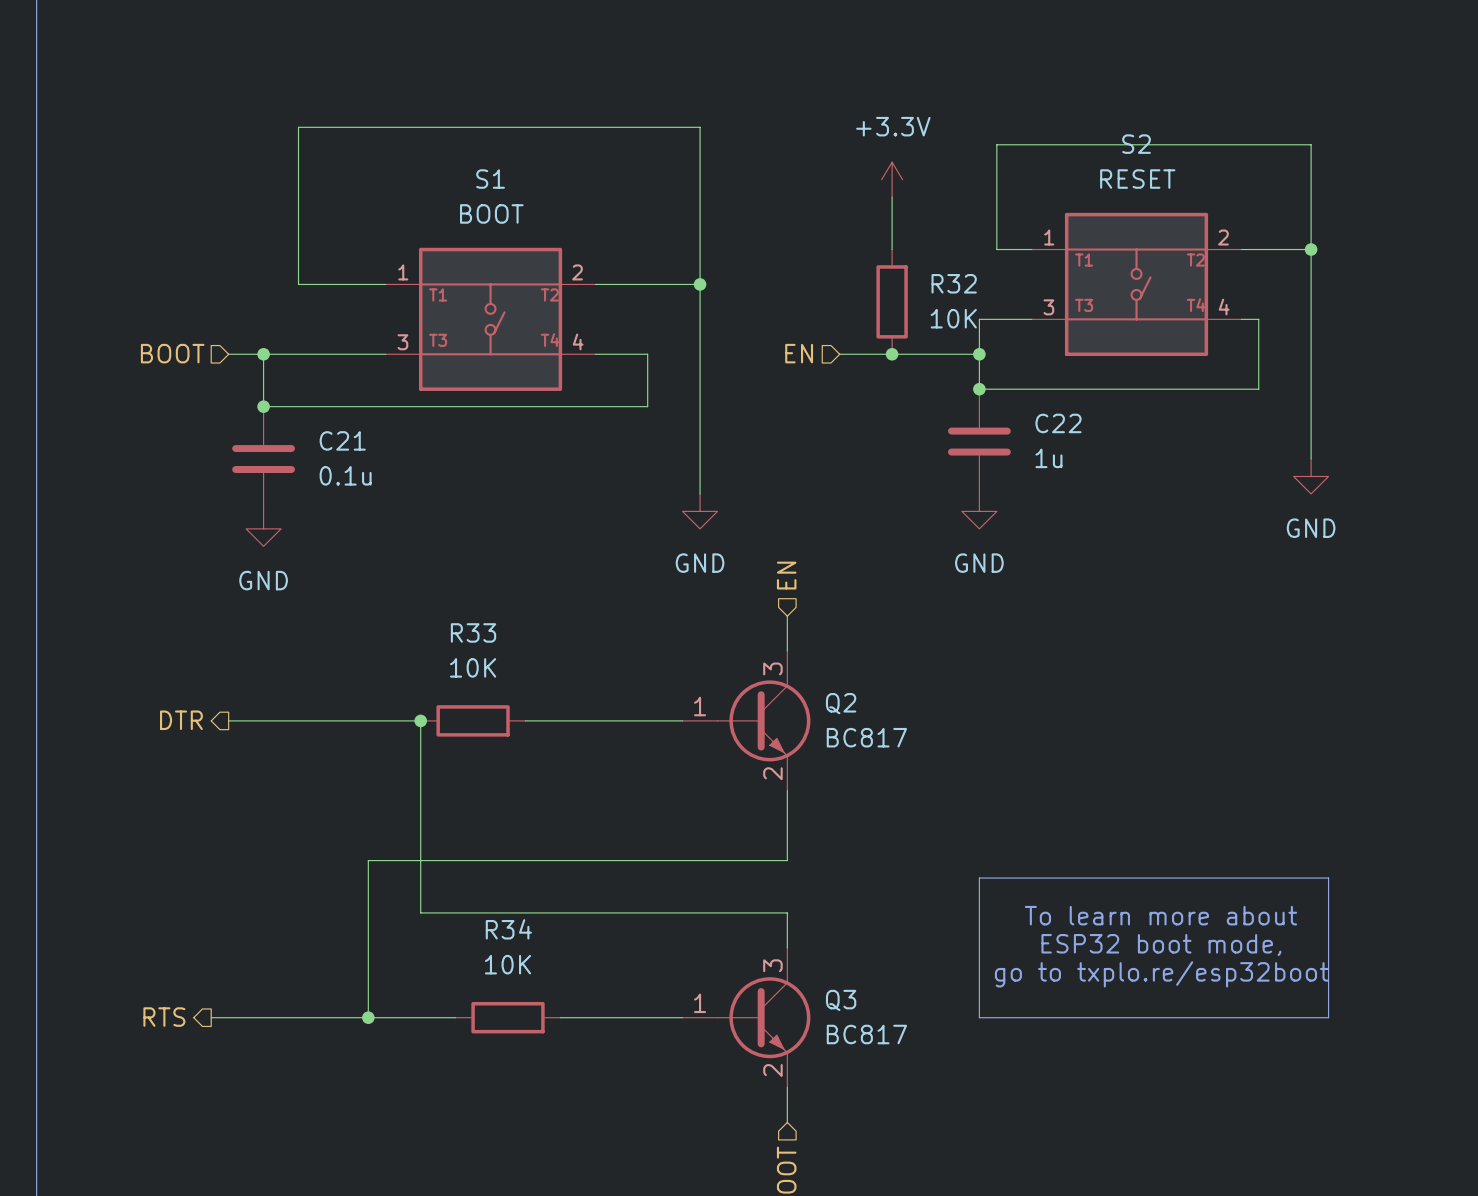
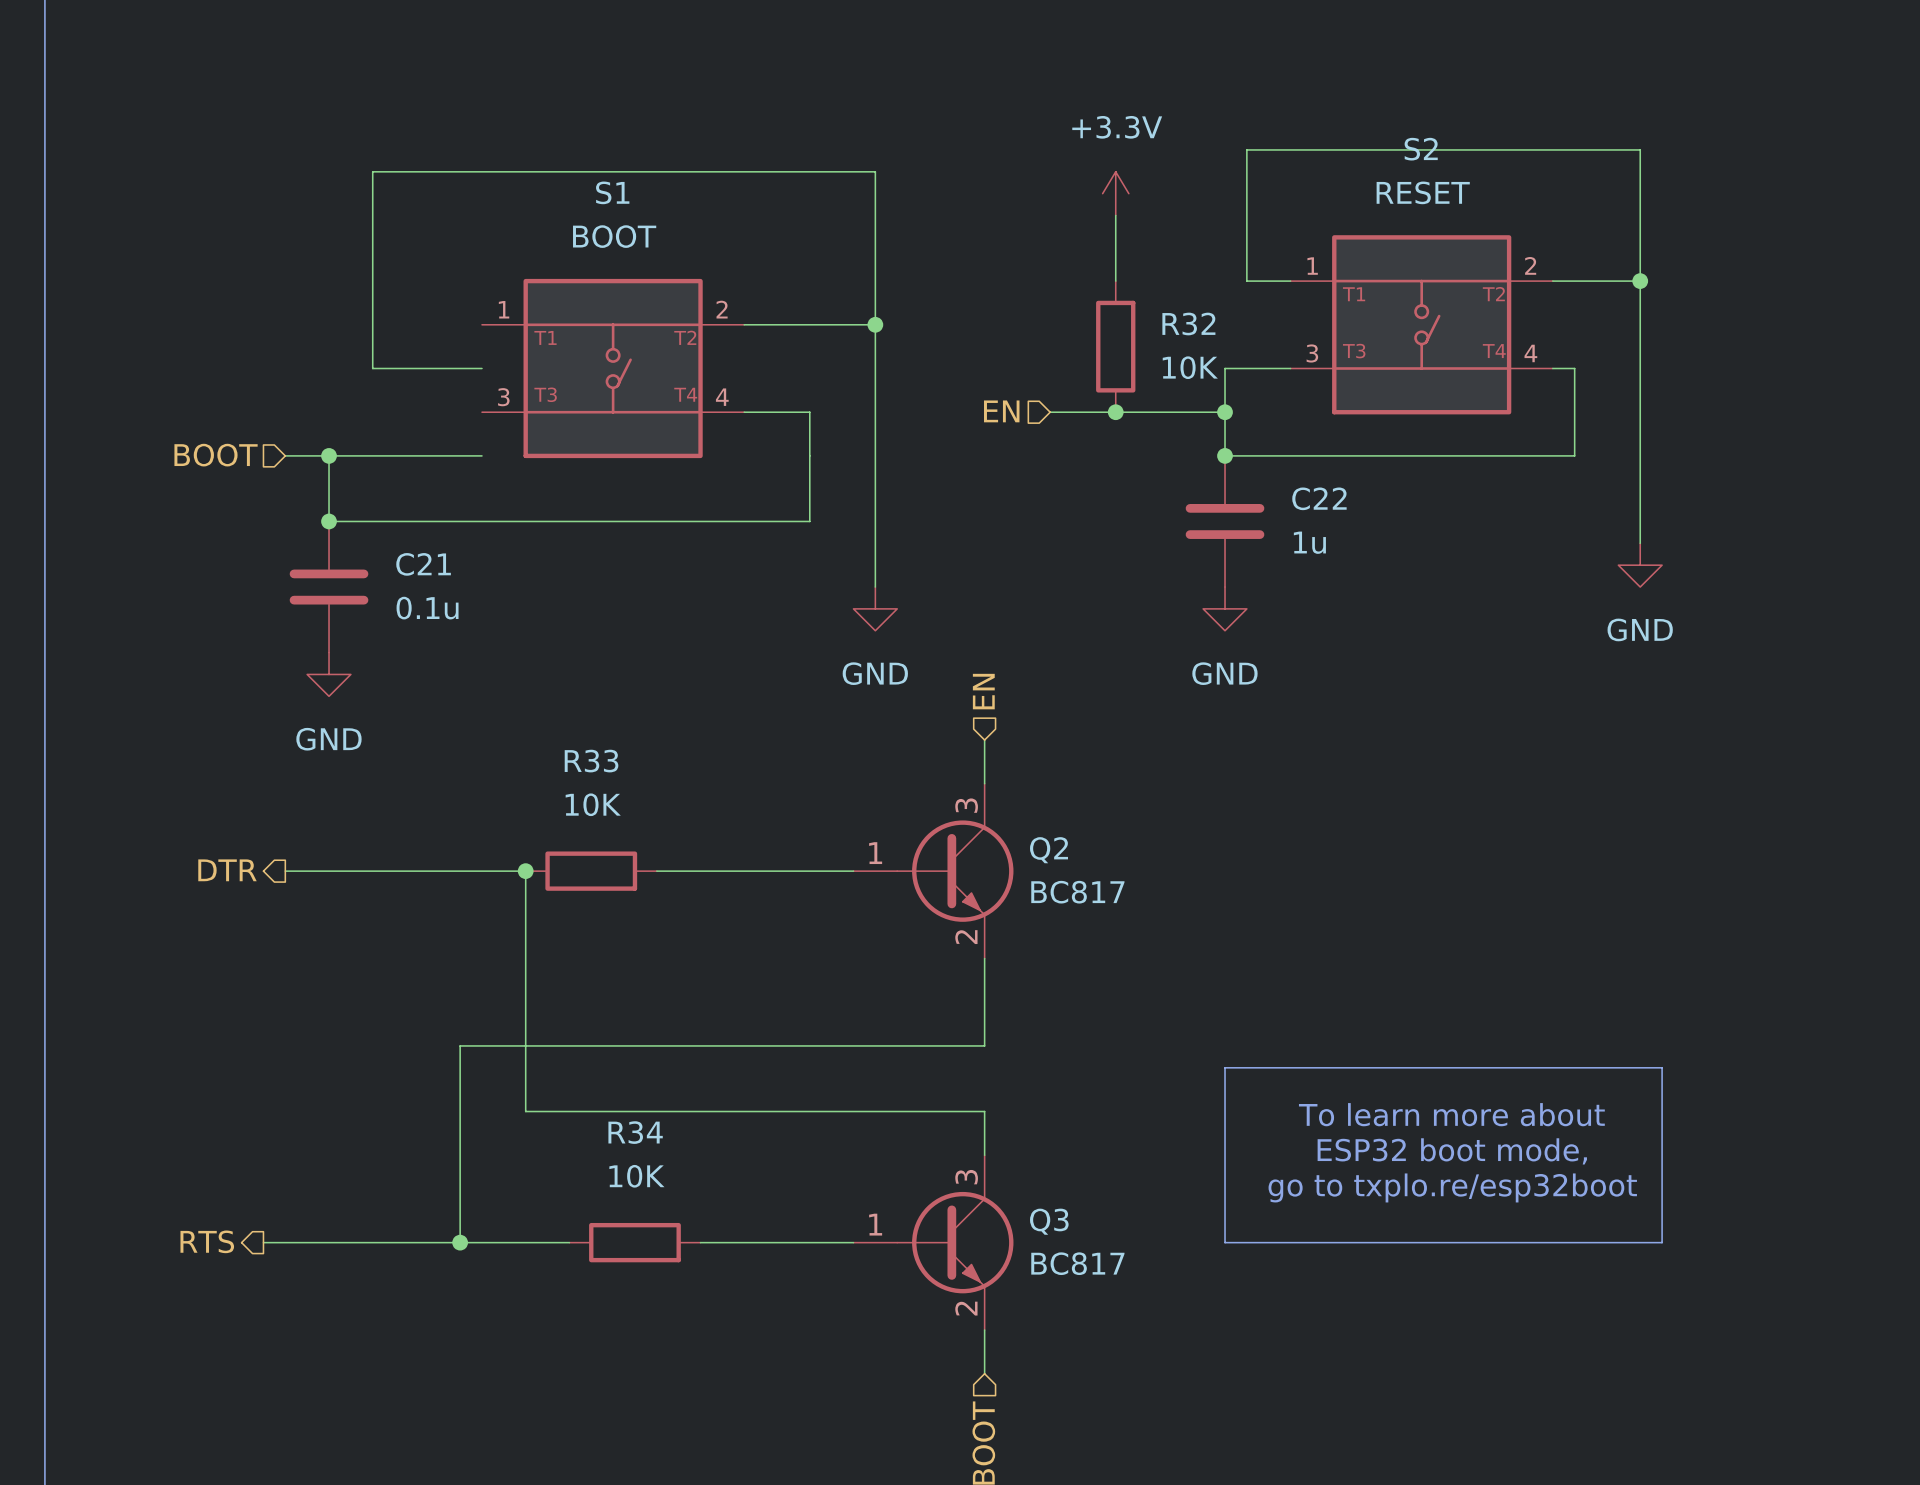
wire: (298, 162) (298, 127) (700, 127) (700, 162) -> (372, 171) (875, 171)
wire: (298, 284) (385, 284) -> (372, 324) (372, 368) (481, 368)
hierarchical label position: BOOT (172, 353) -> BOOT (216, 455)
wire: (228, 354) (385, 354) -> (285, 455) (481, 455)
wire: (263, 354) (263, 389) -> none
junction: (263, 354) -> none
junction: none -> (329, 455)
wire: (263, 406) (647, 406) -> (329, 477) (329, 521) (809, 521) (809, 477)
junction: (263, 406) -> none
junction: none -> (329, 521)
C21 position: (263, 459) -> (329, 587)
power symbol position: GND (263, 528) -> GND (329, 674)

